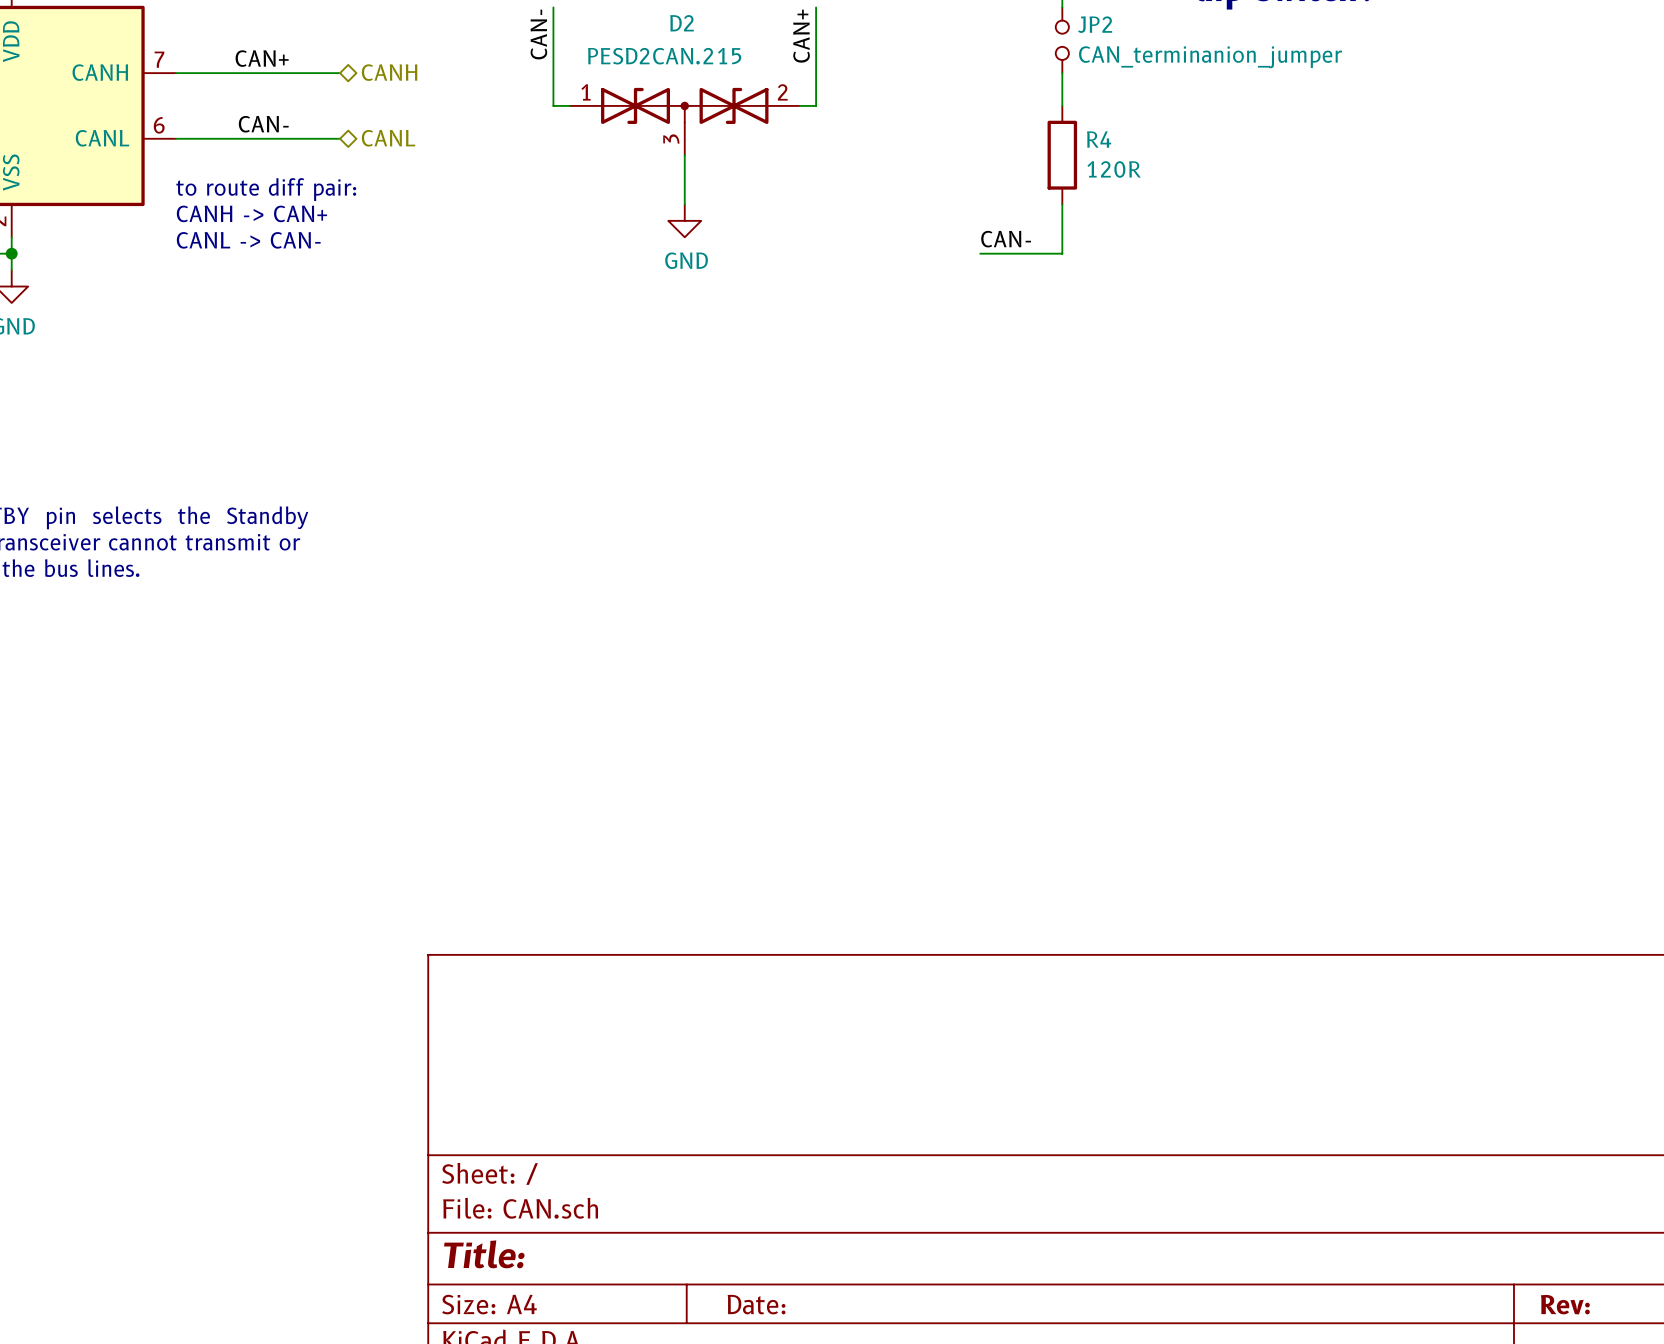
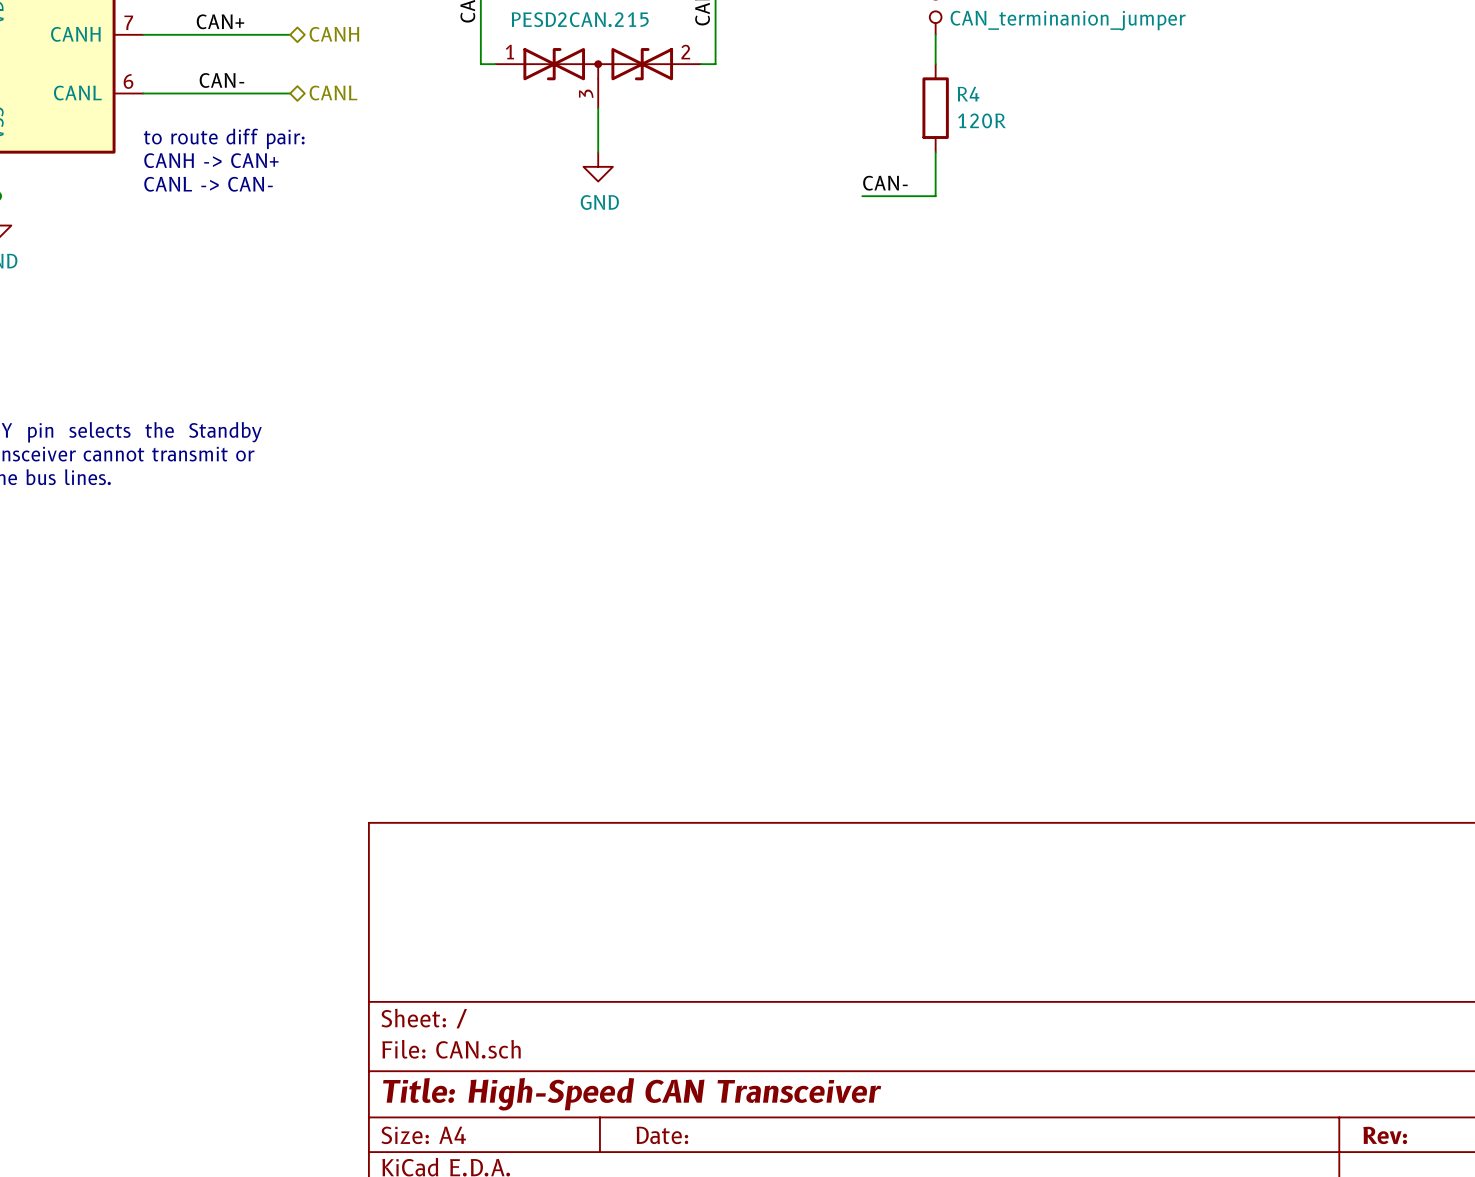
title block: Title: (484, 1254) -> Title: High-Speed CAN Transceiver (632, 1094)

